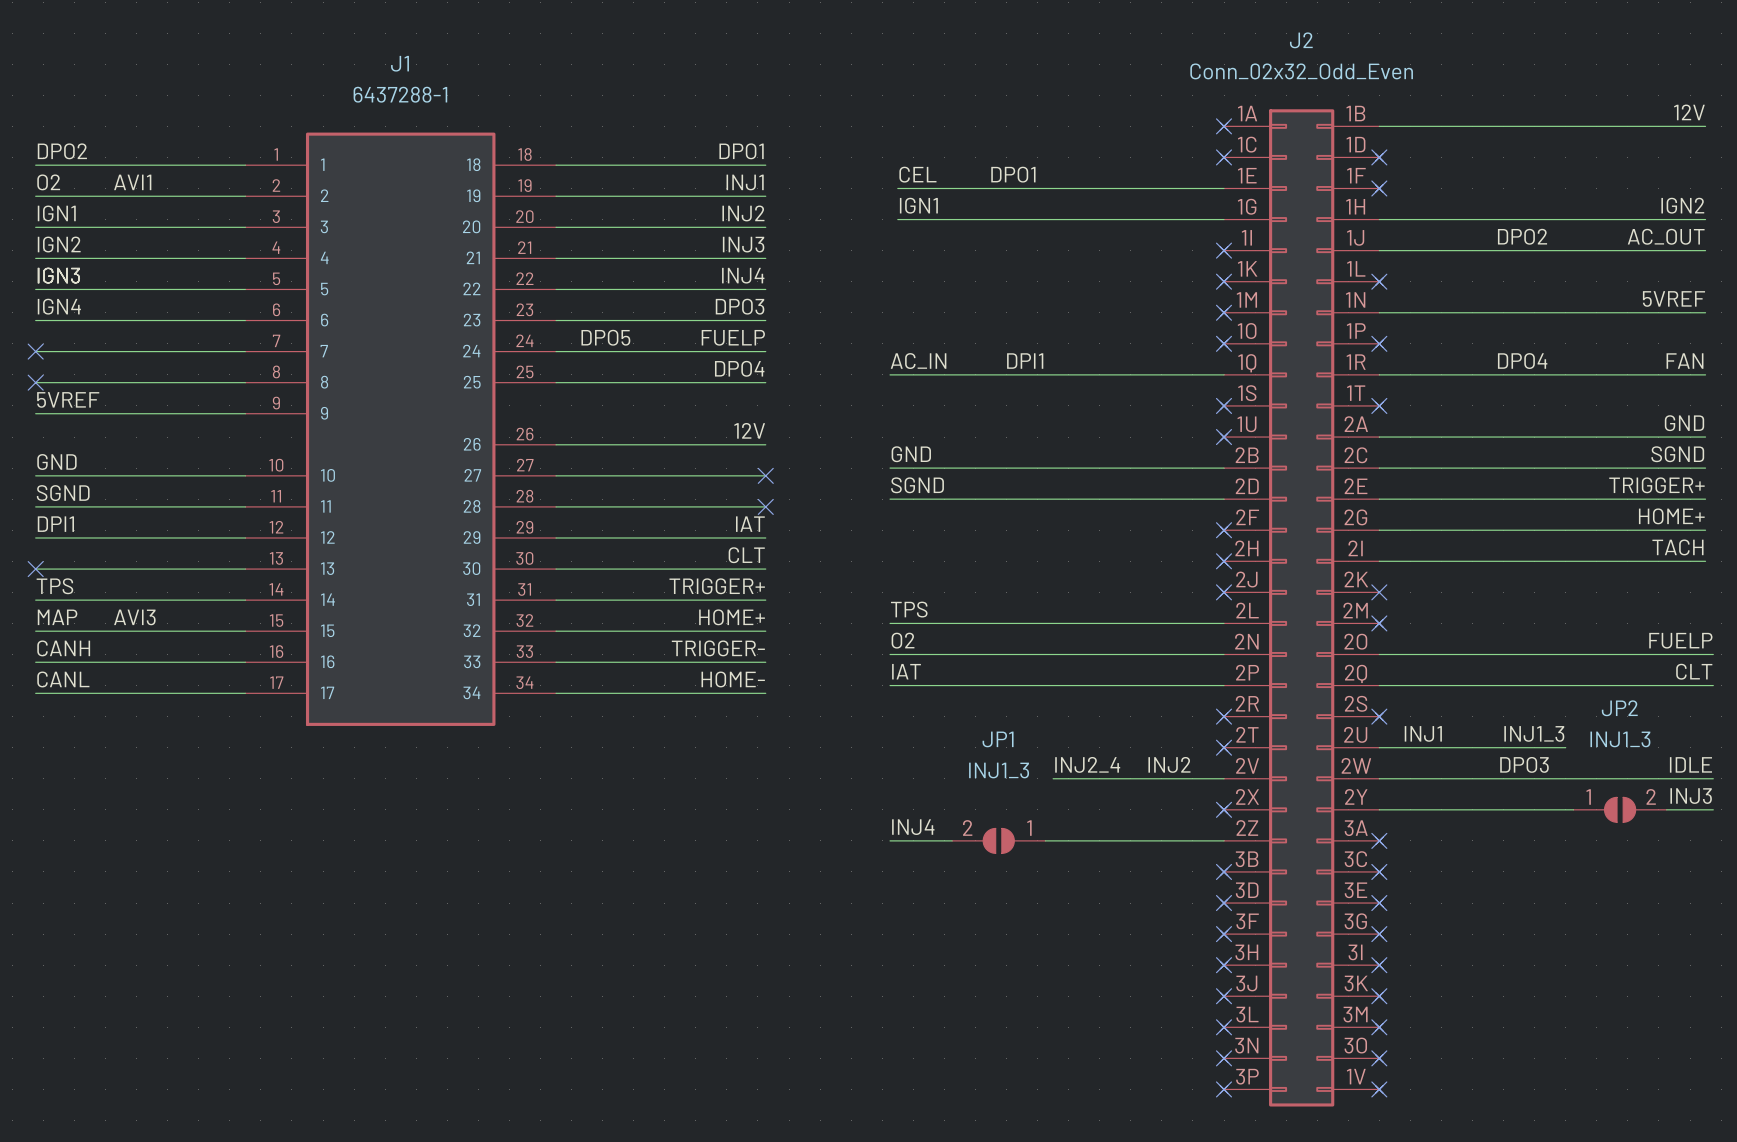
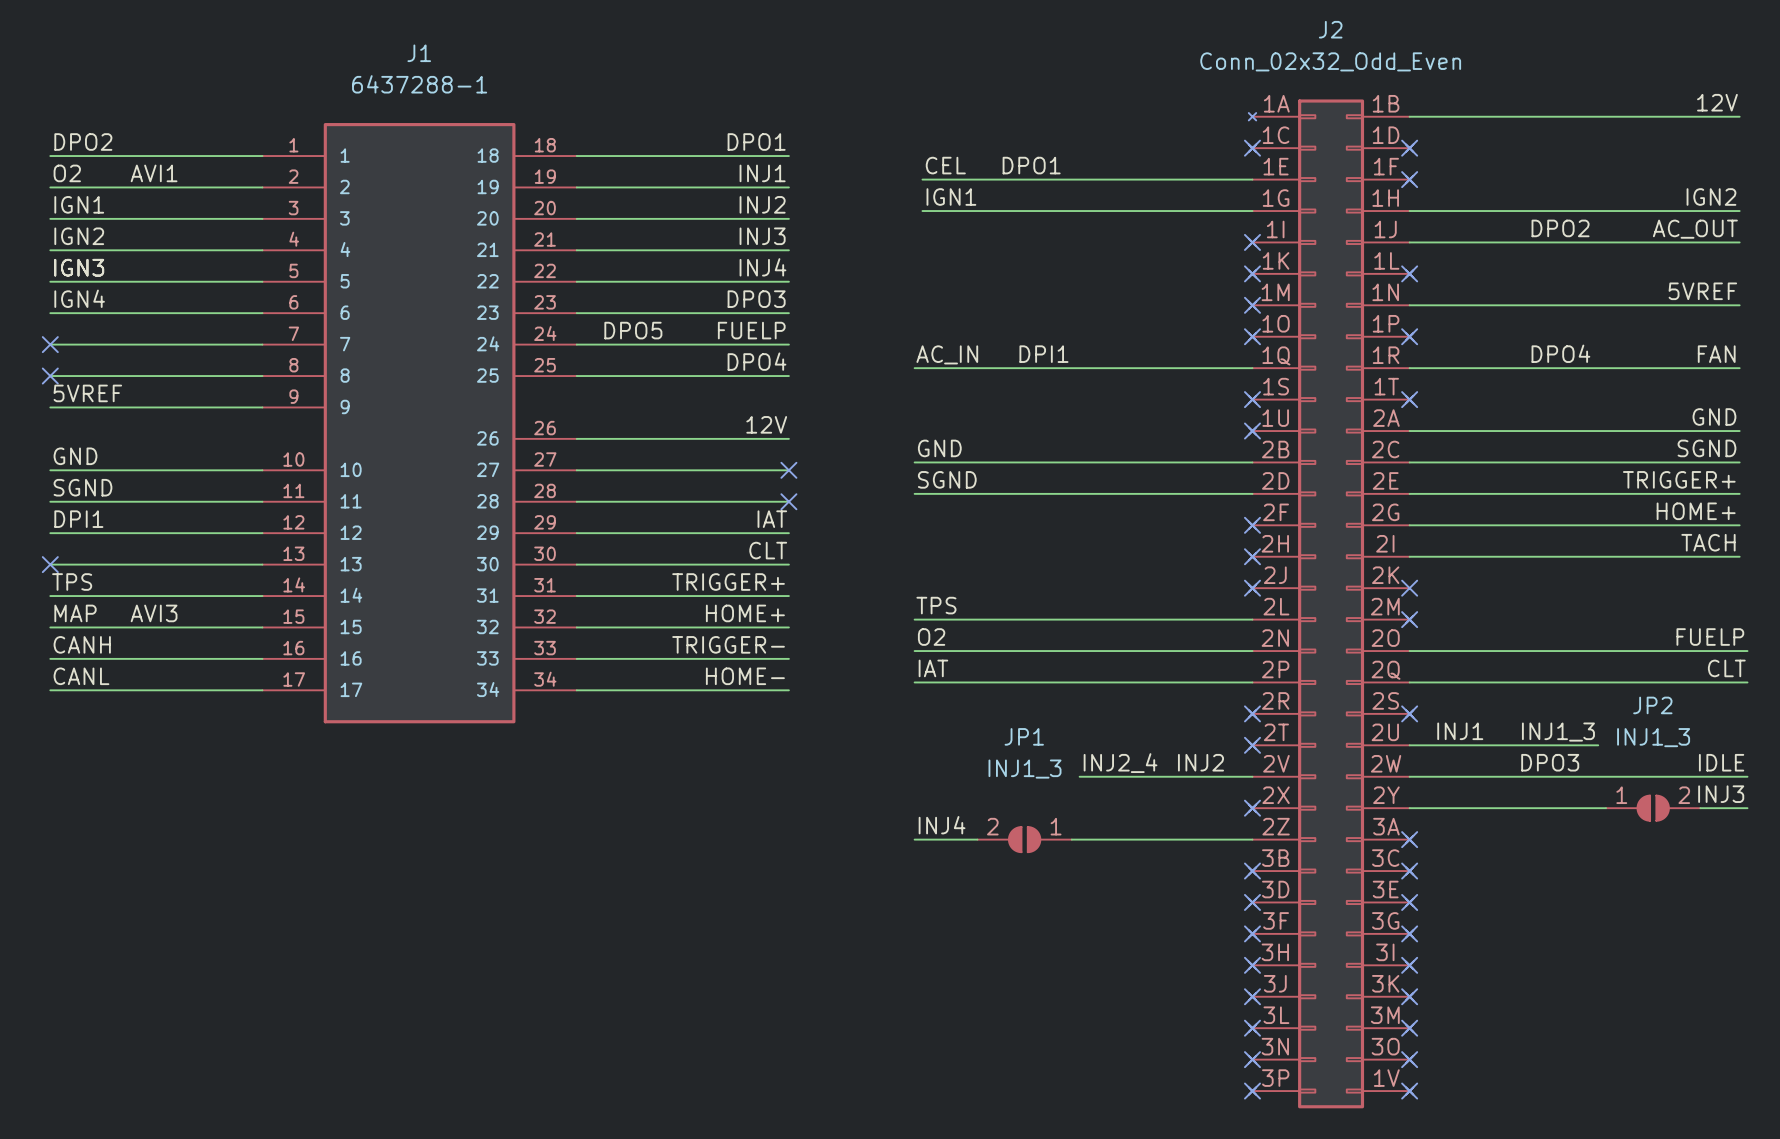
no-connect mark: (1224, 126) -> none

